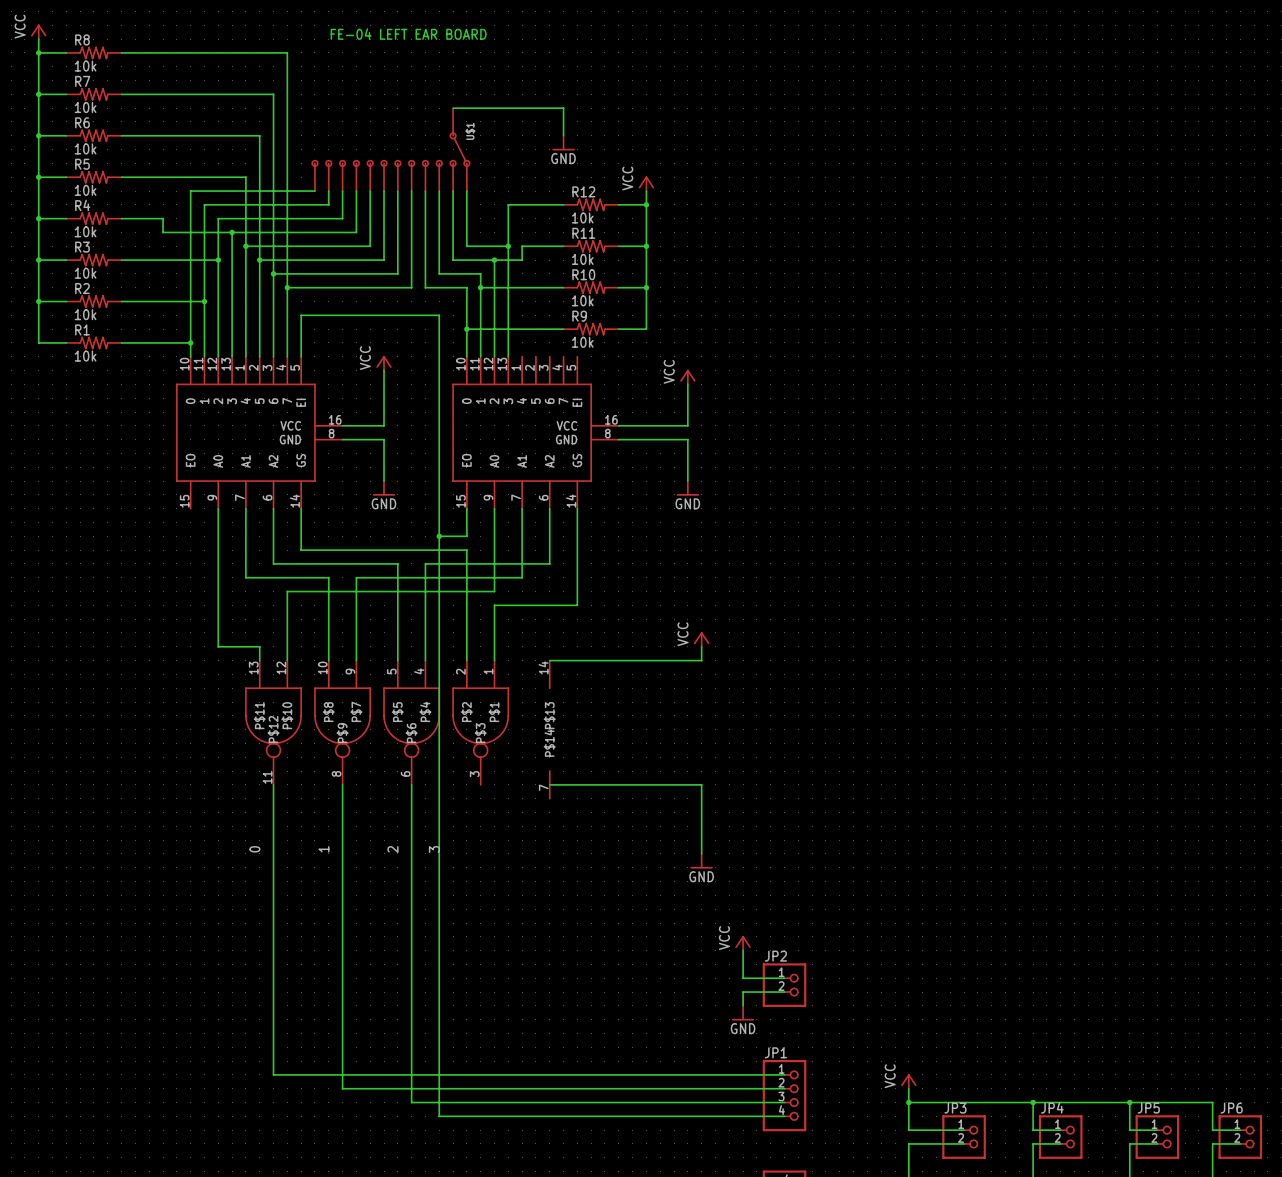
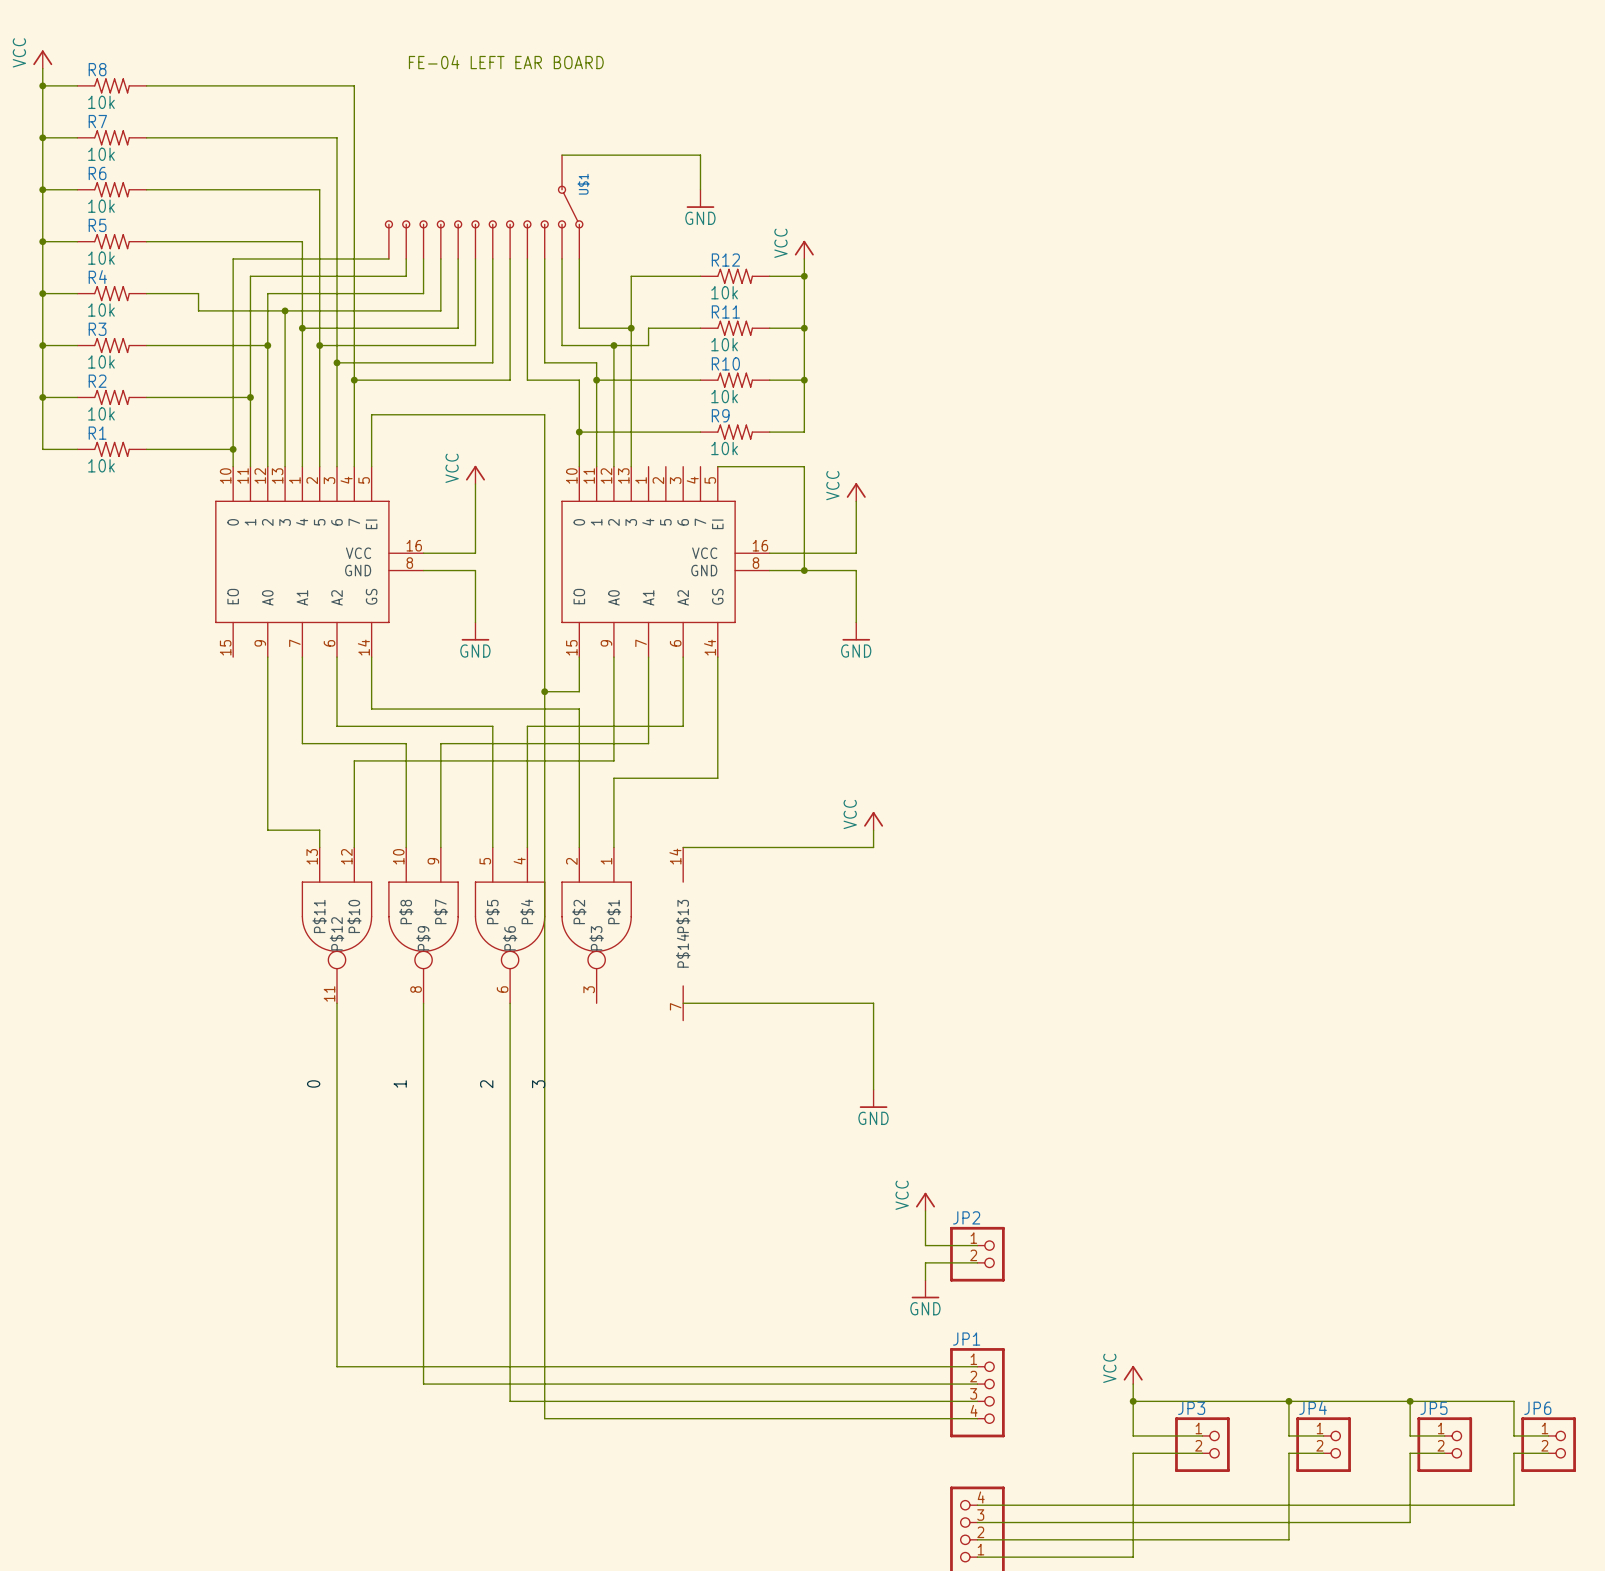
wire: none -> (717, 466) (804, 466) (804, 570)
junction: none -> (804, 570)

